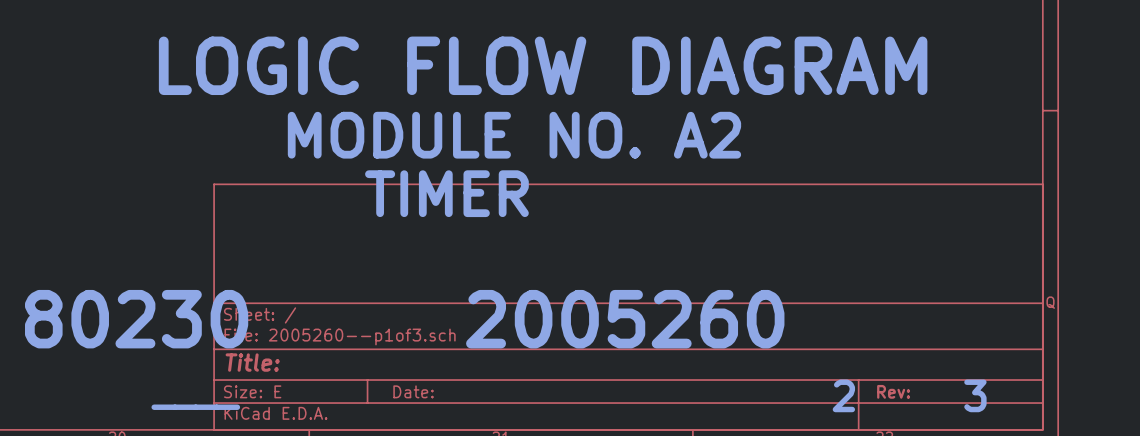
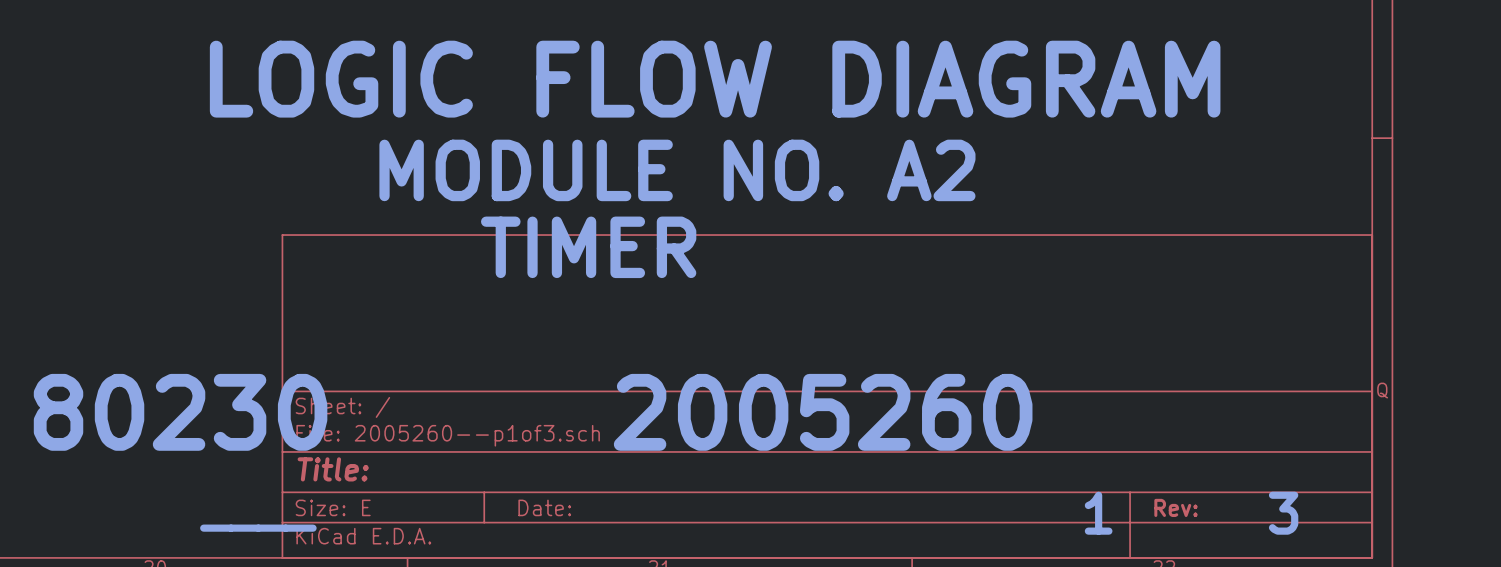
text: none -> 1 (1098, 513)
text: 2 (843, 395) -> none

